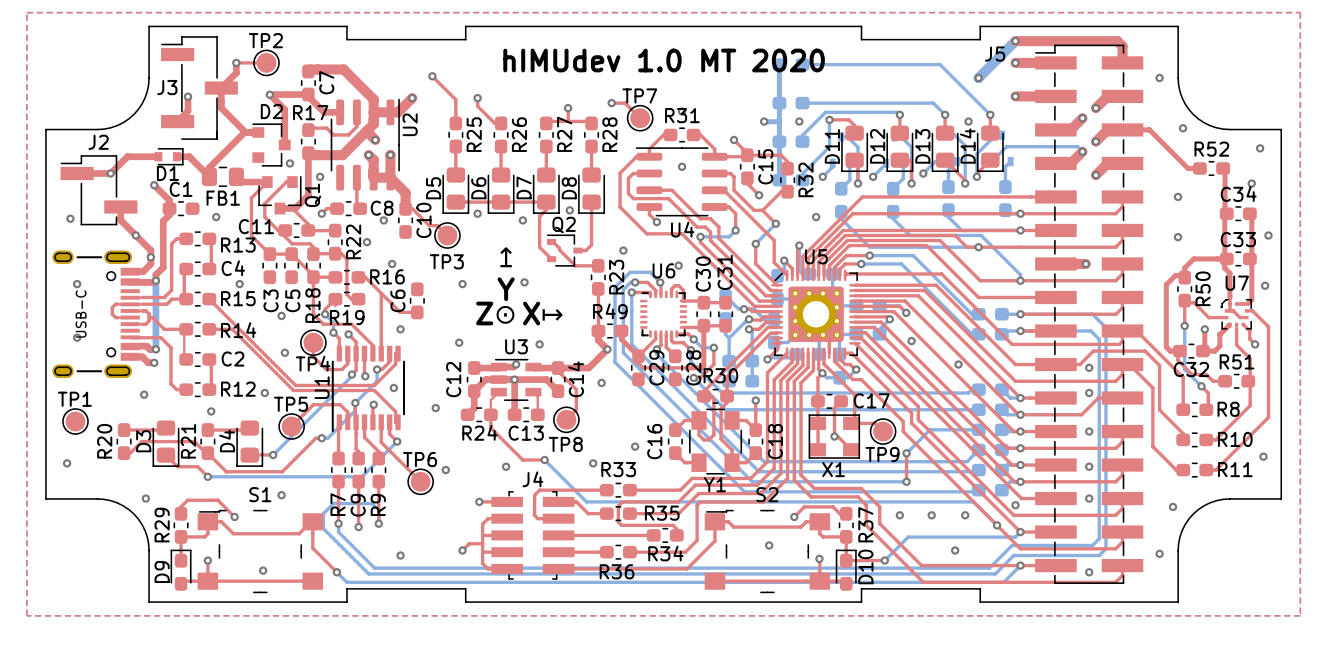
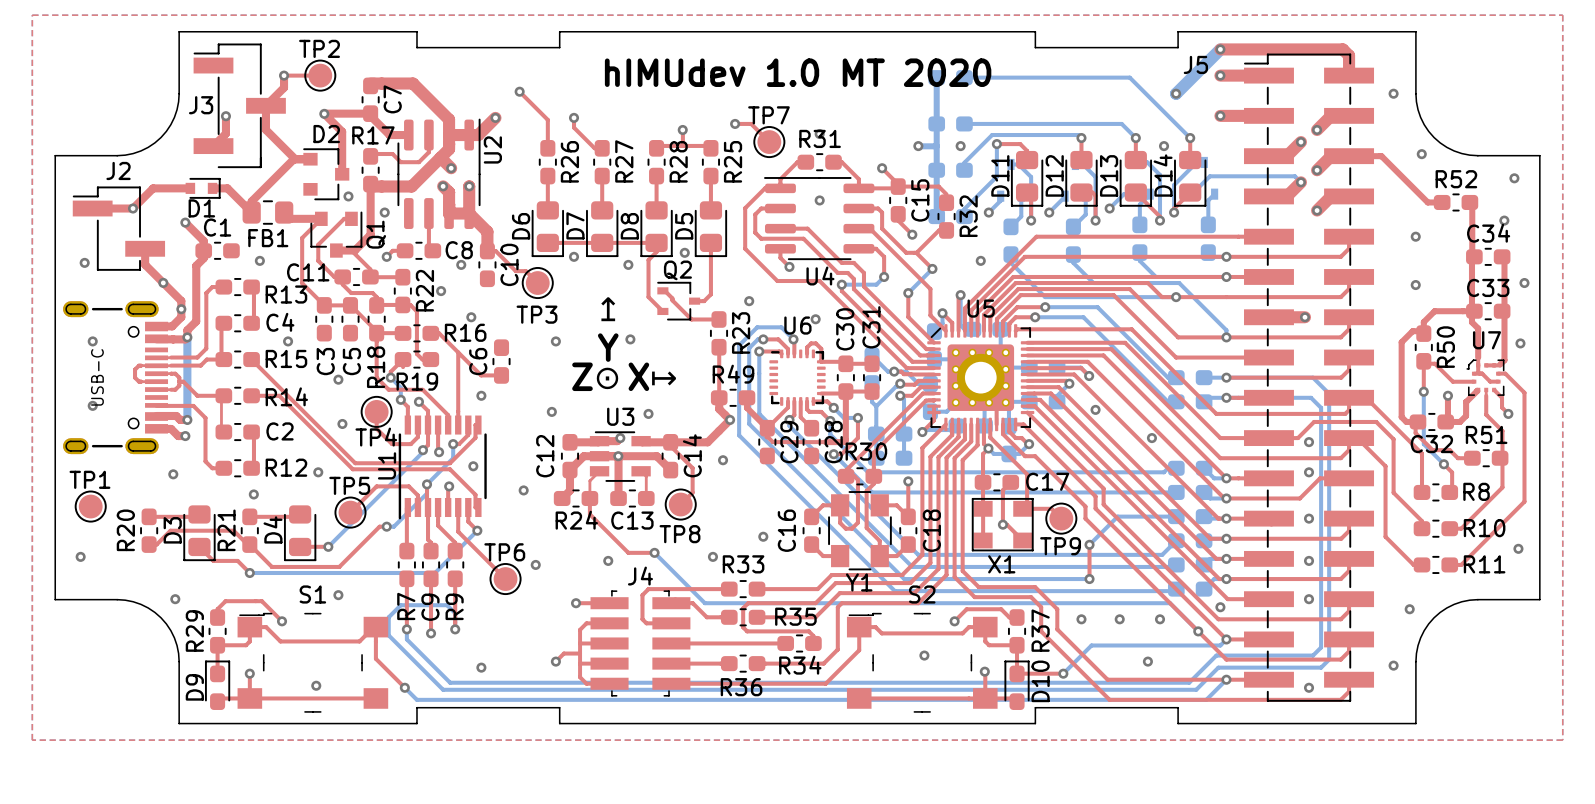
R25 name: R25 (474, 134) -> R26 (569, 161)
R26 name: R26 (519, 134) -> R27 (624, 161)
R27 name: R27 (564, 134) -> R28 (678, 161)
R28 name: R28 (609, 134) -> R25 (733, 161)
D7 name: D7 (524, 187) -> D8 (629, 226)
D5 name: D5 (433, 188) -> D6 (521, 226)
D6 name: D6 (478, 188) -> D7 (575, 225)
D8 name: D8 (569, 188) -> D5 (684, 226)

